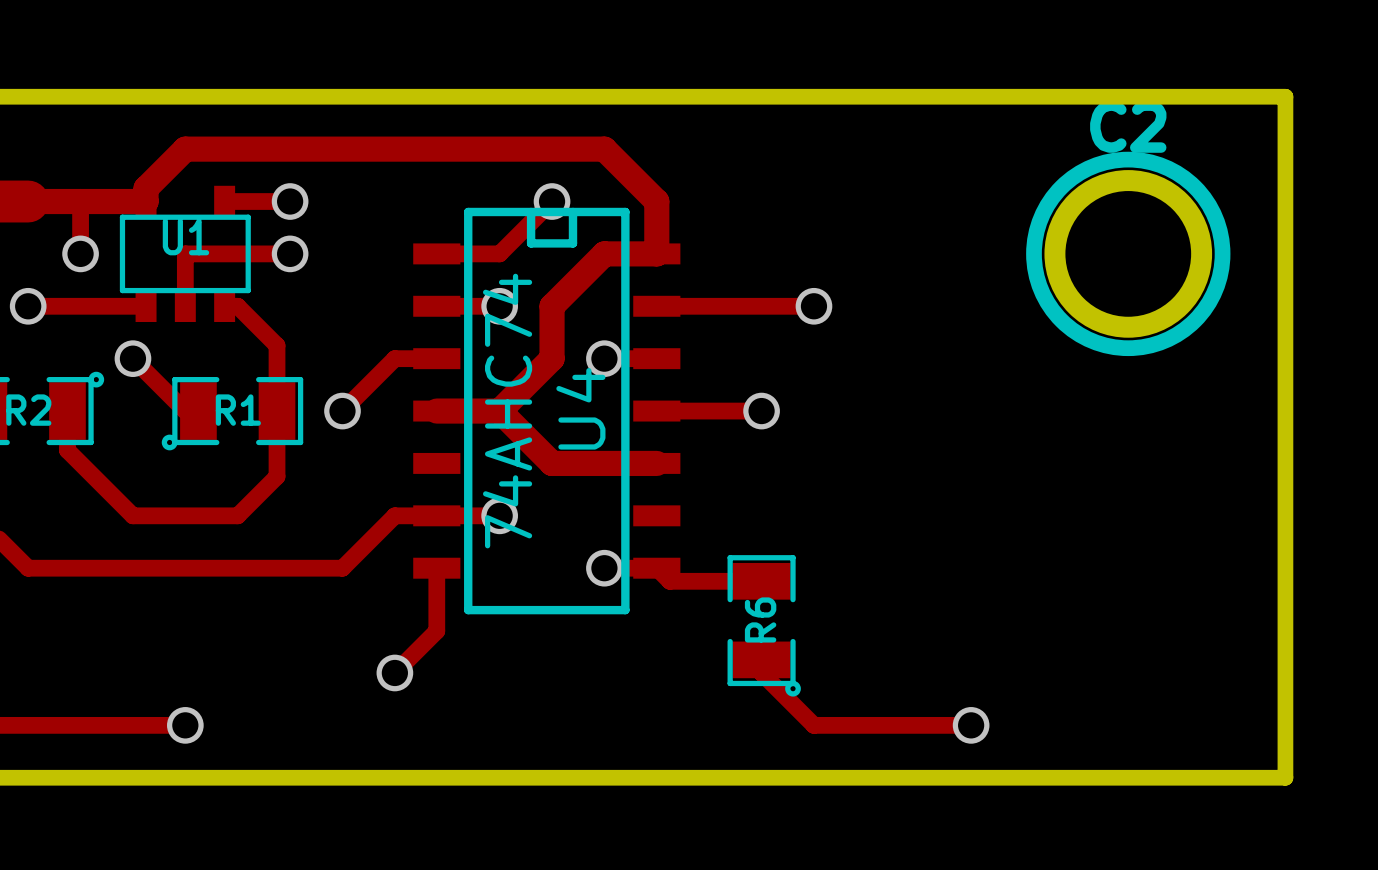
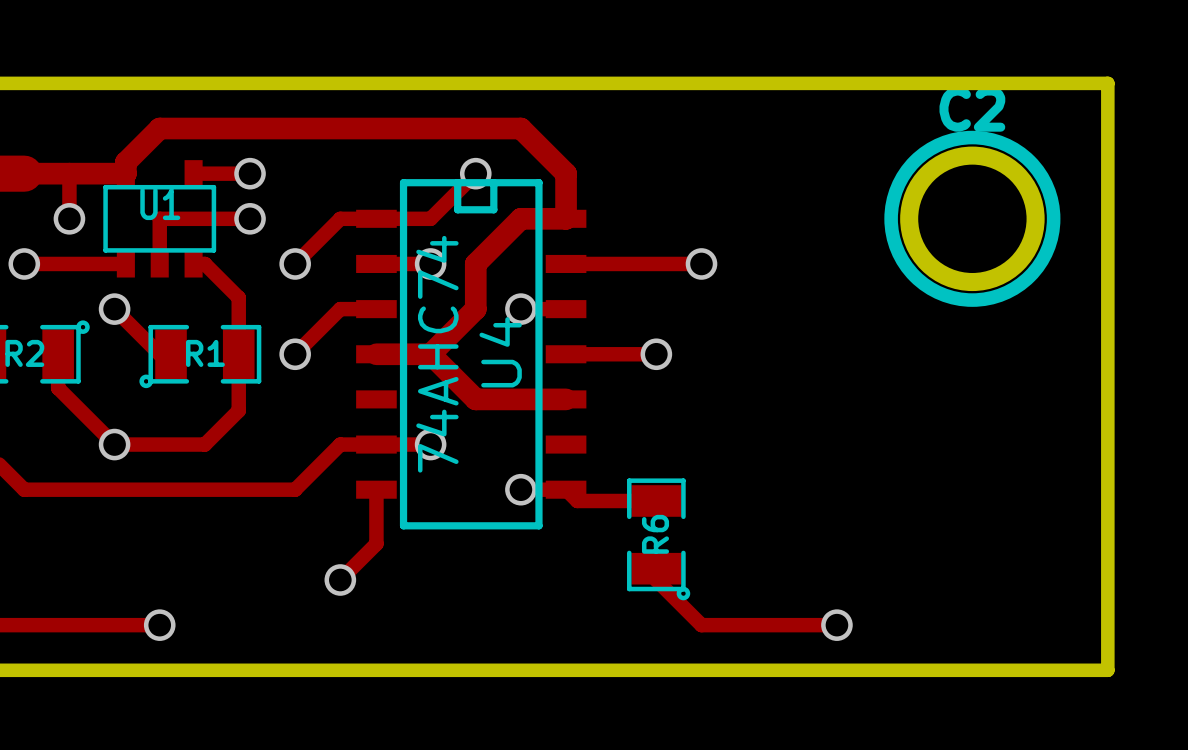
track: none -> (376, 218) (340, 218) (295, 263)
via: none -> (295, 263)
via: none -> (114, 444)

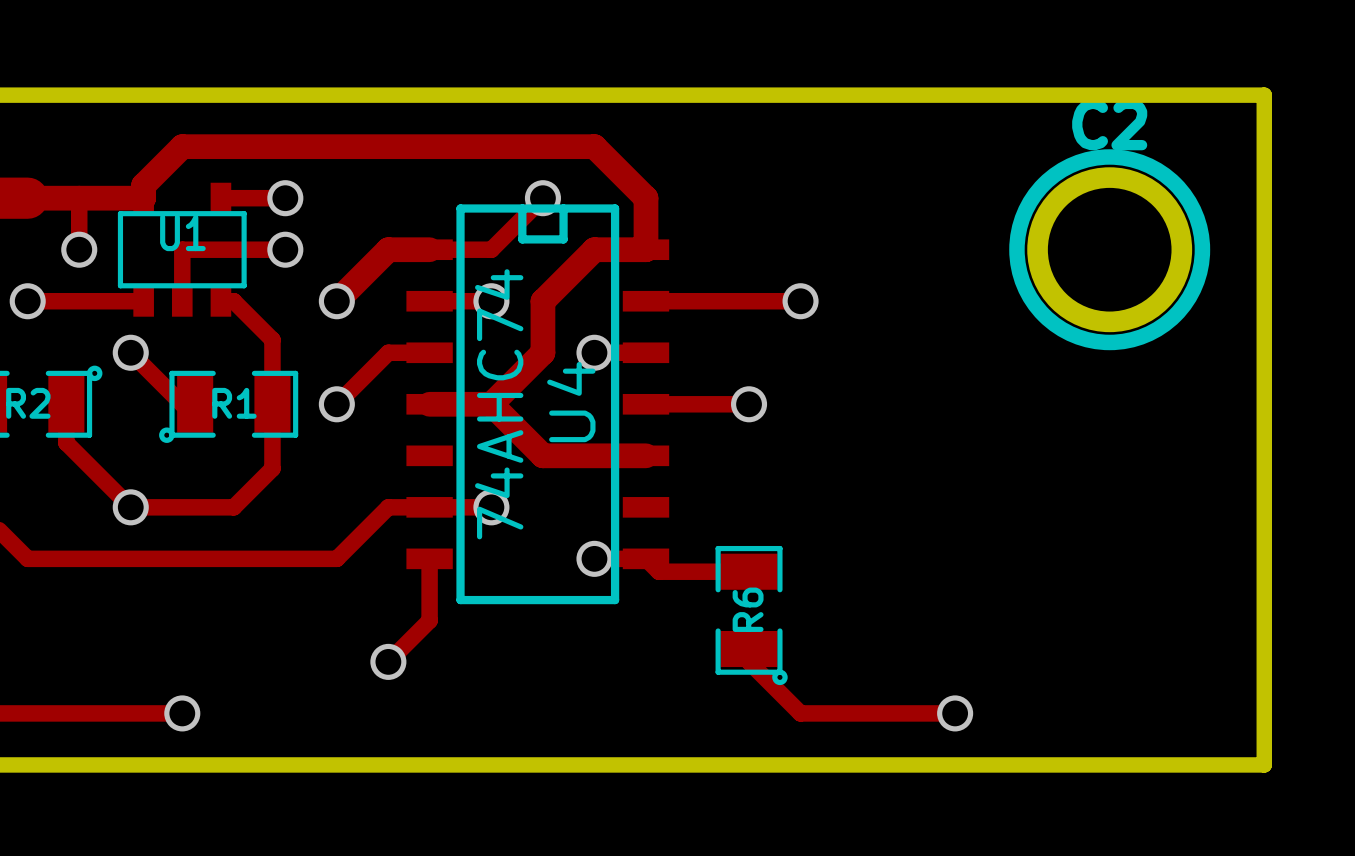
track width: thin (376, 218) (340, 218) (295, 263) -> thick (429, 249) (388, 249) (336, 301)

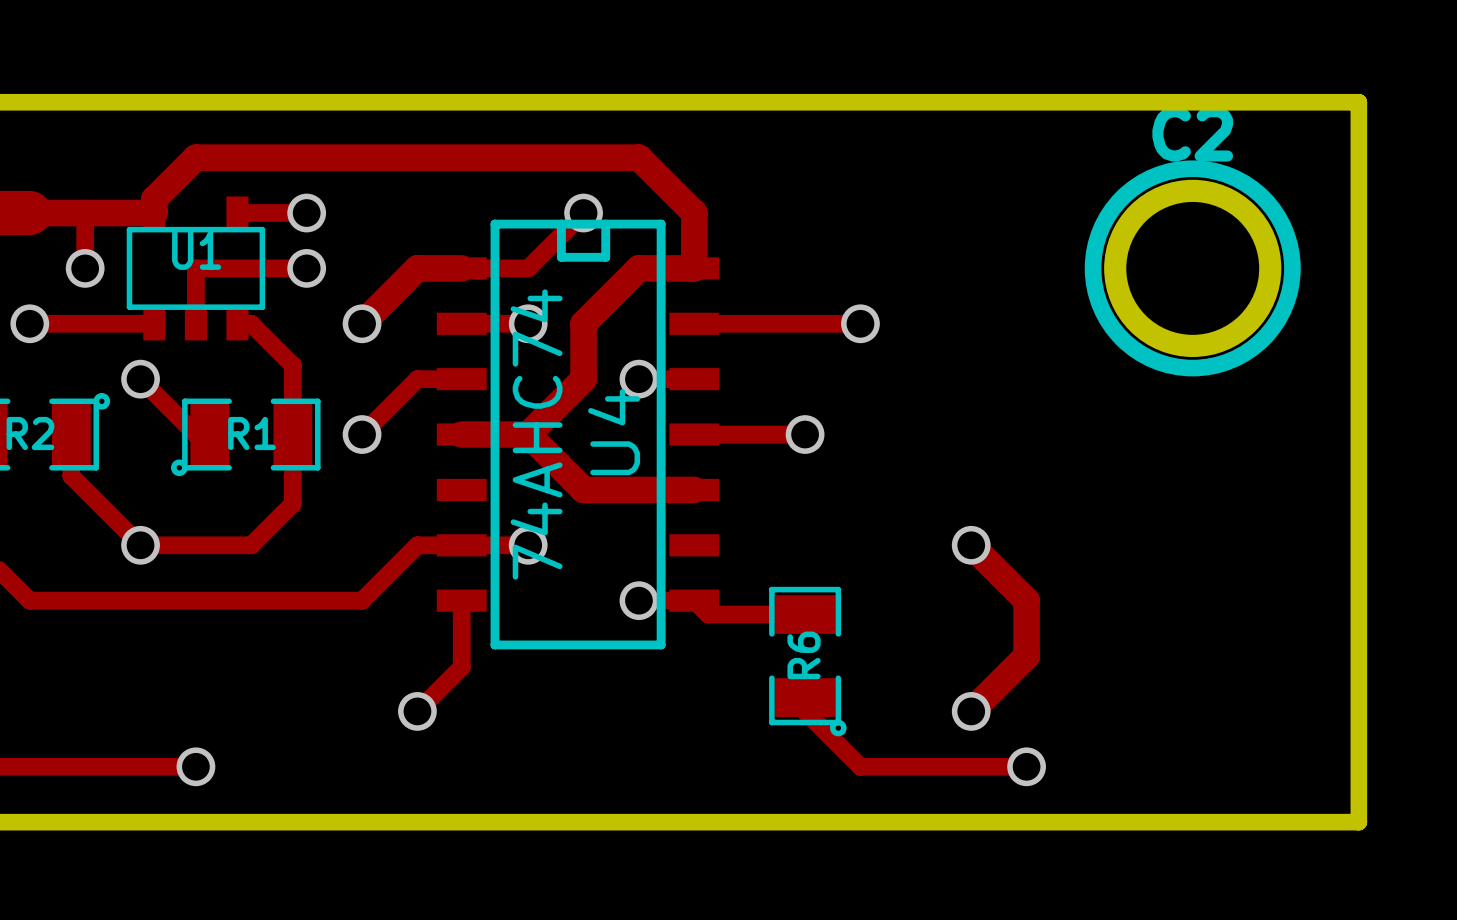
track: none -> (971, 545) (1026, 600) (1026, 656) (971, 711)
via: none -> (971, 545)
via: none -> (971, 711)

